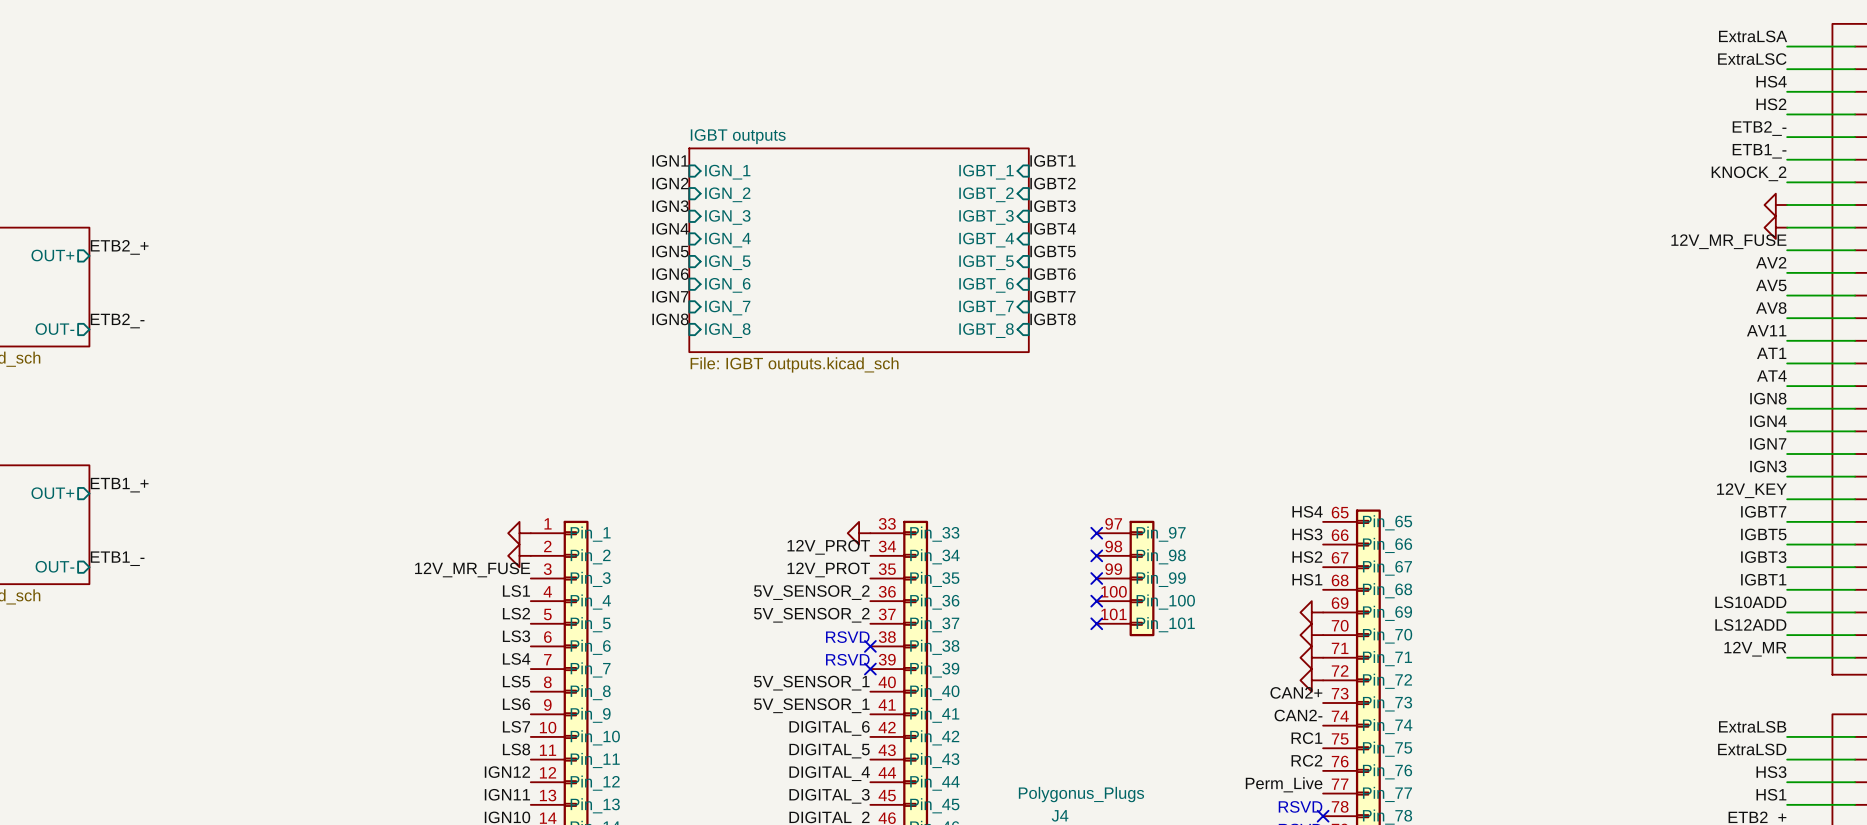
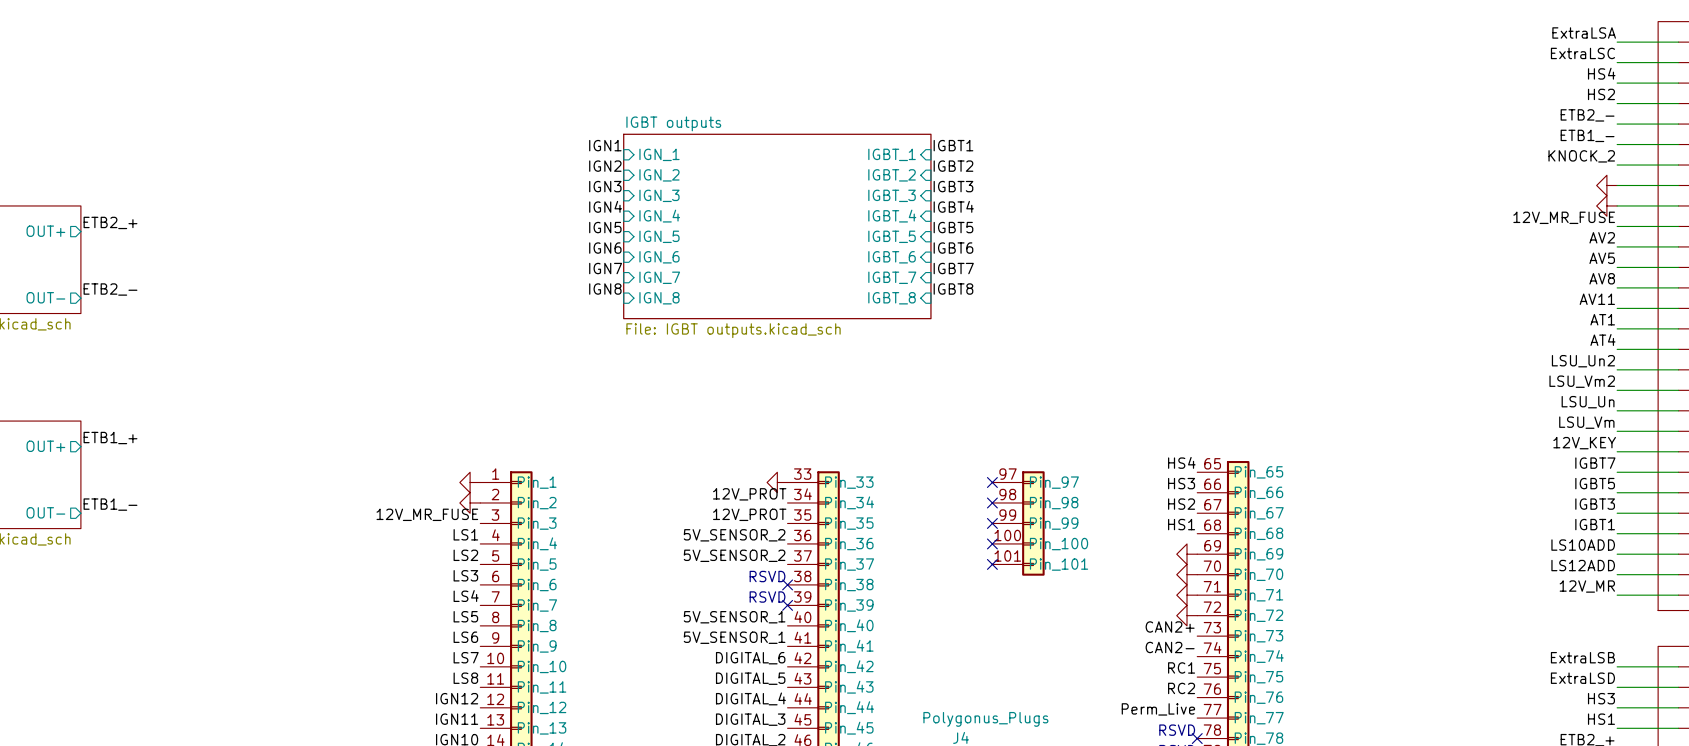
label: IGN8 (1768, 398) -> LSU_Un2 (1583, 361)
label: IGN4 (1768, 421) -> LSU_Vm2 (1582, 381)
label: IGN7 (1768, 443) -> LSU_Un (1588, 402)
label: IGN3 (1768, 466) -> LSU_Vm (1586, 422)

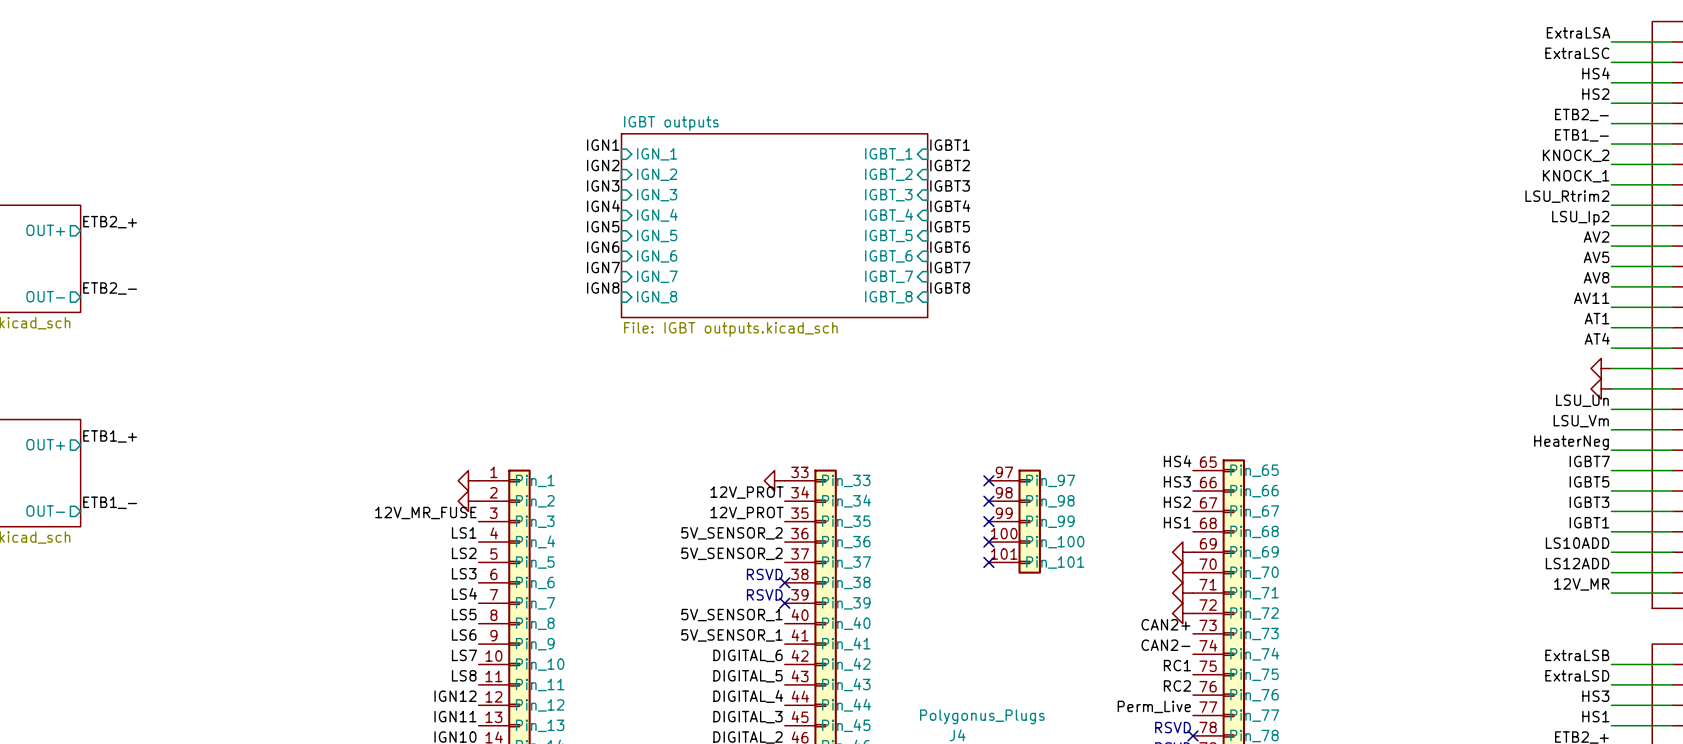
label: none -> KNOCK_1 (1576, 176)
power symbol: (1606, 185) -> none
label: none -> LSU_Rtrim2 (1567, 196)
power symbol: (1606, 205) -> none
label: 12V_MR_FUSE (1564, 217) -> LSU_Ip2 (1580, 218)
label: LSU_Un2 (1583, 361) -> none
power symbol: none -> (1601, 368)
label: LSU_Vm2 (1582, 381) -> none
power symbol: none -> (1601, 388)
label: 12V_KEY (1584, 443) -> HeaterNeg (1571, 442)

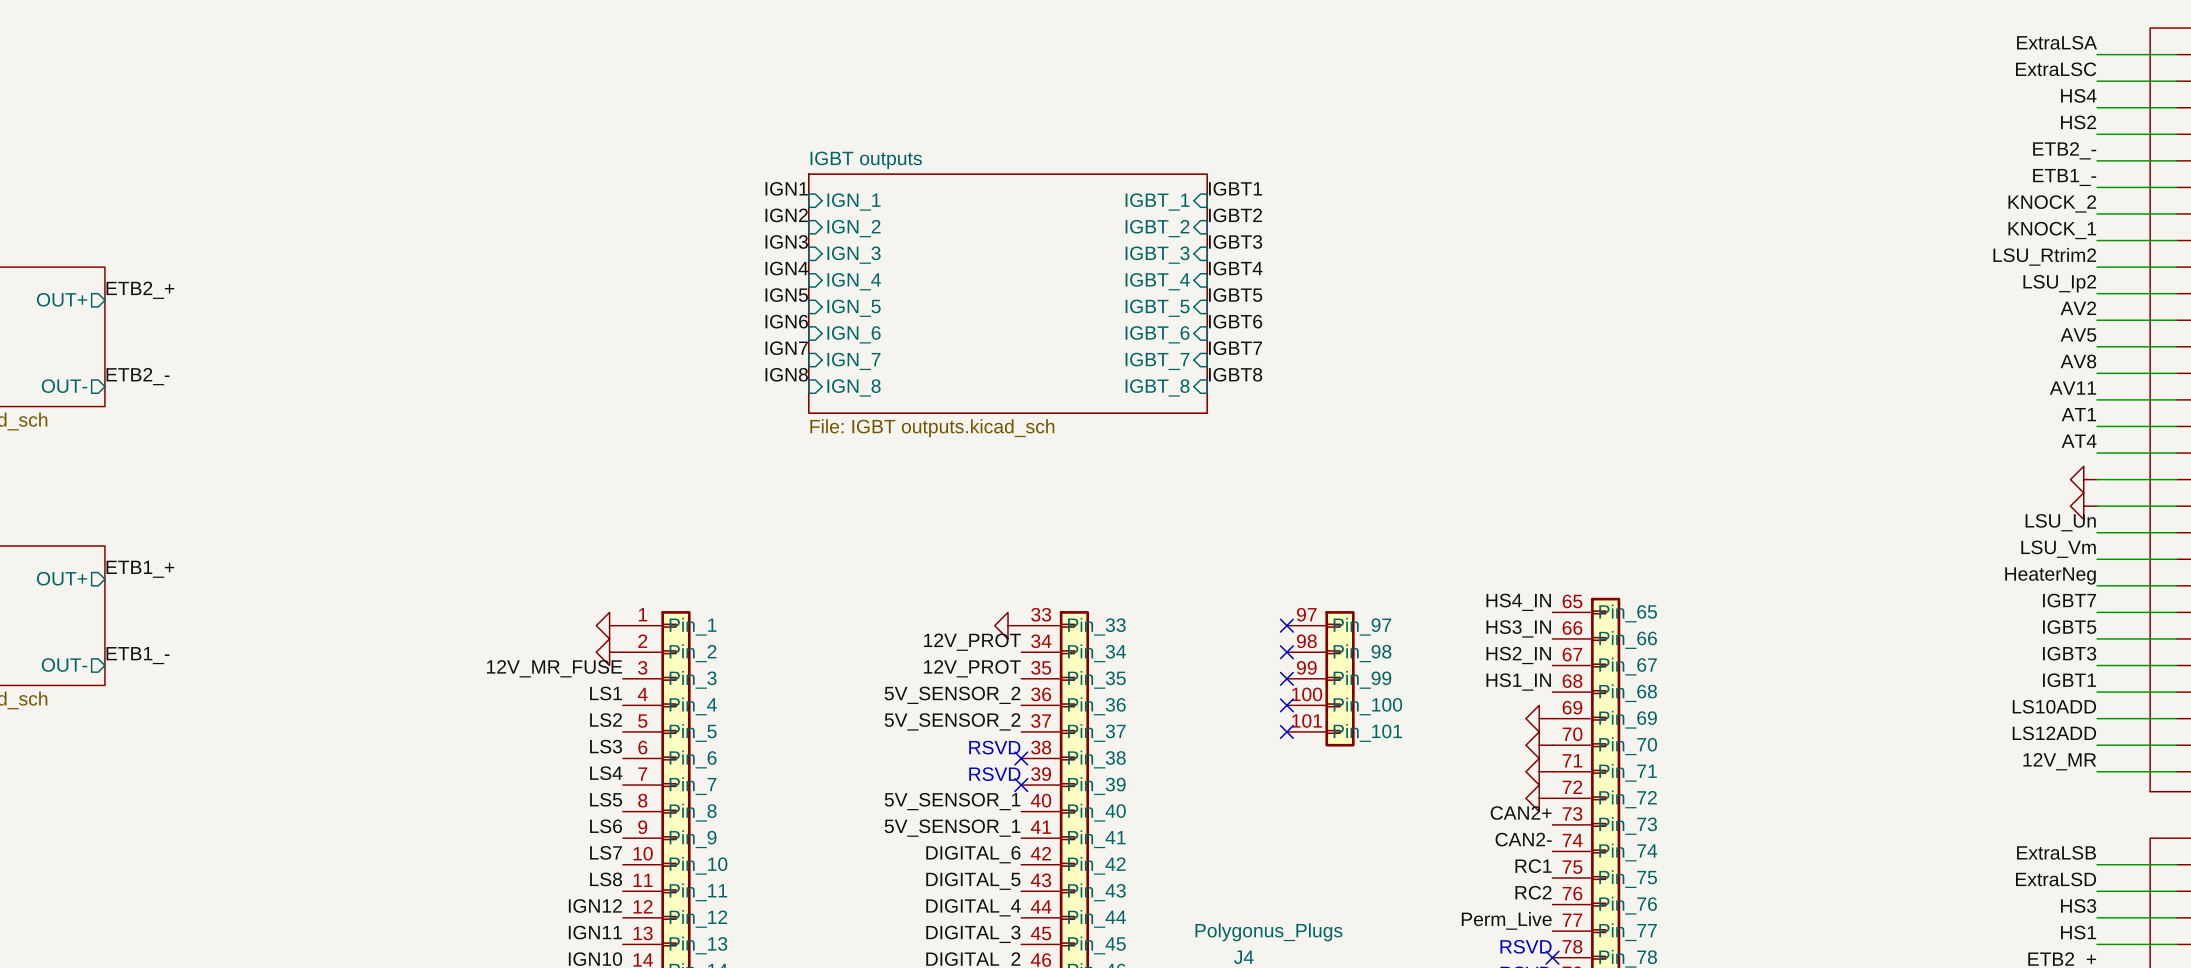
label: HS4 (1177, 461) -> HS4_IN (1518, 602)
label: HS3 (1177, 481) -> HS3_IN (1518, 628)
label: HS2 (1177, 502) -> HS2_IN (1518, 655)
label: HS1 (1177, 522) -> HS1_IN (1518, 682)

